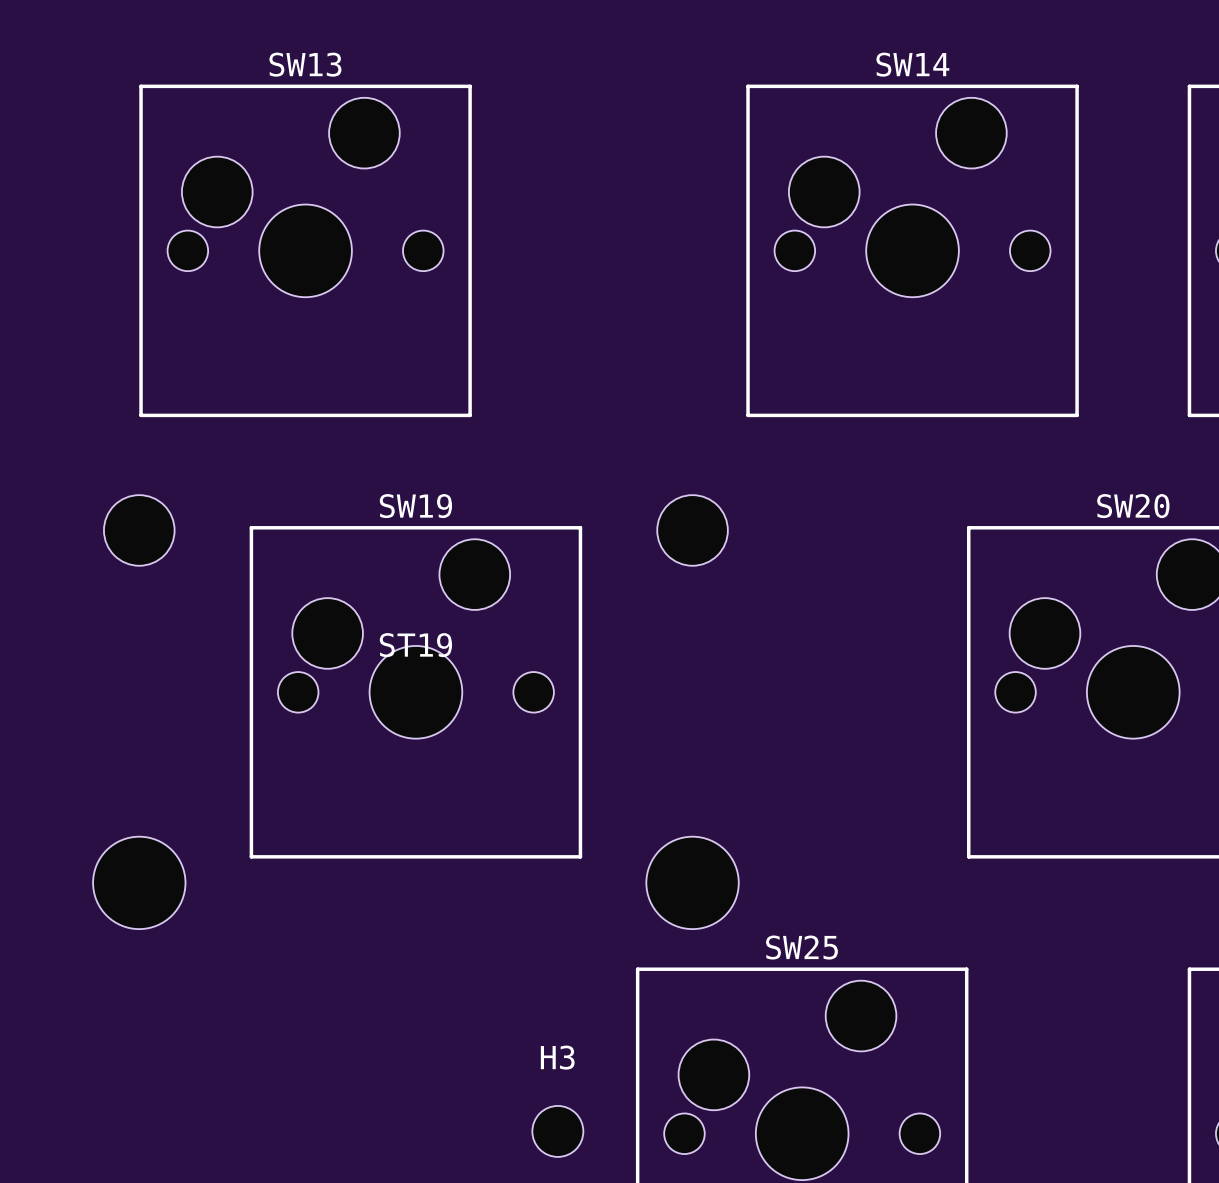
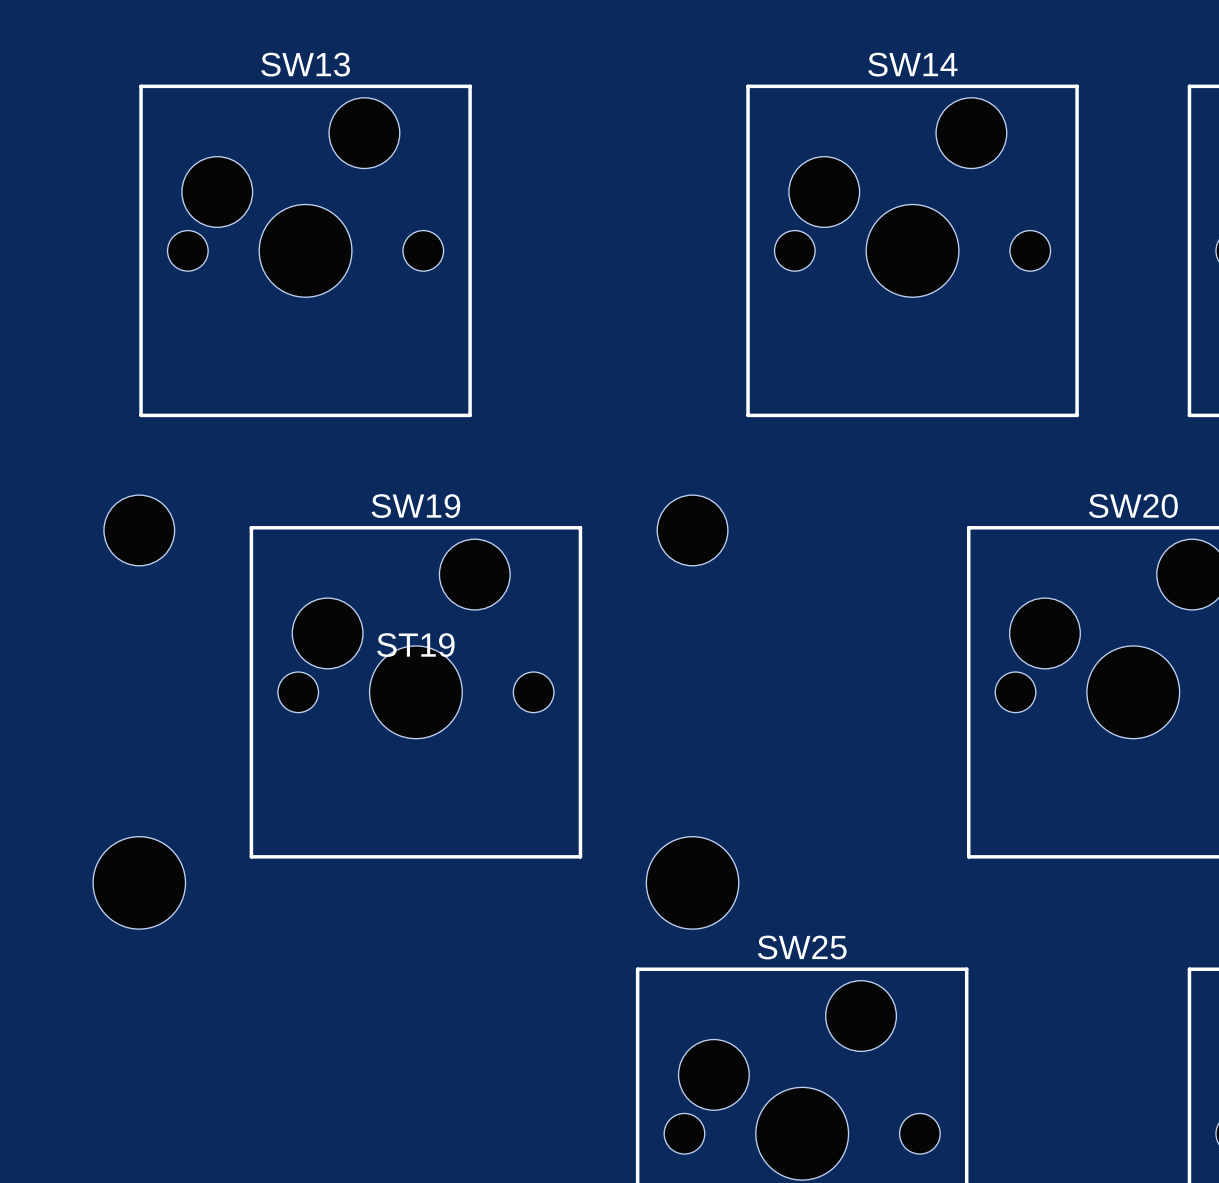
H3: (557, 1131) -> none

